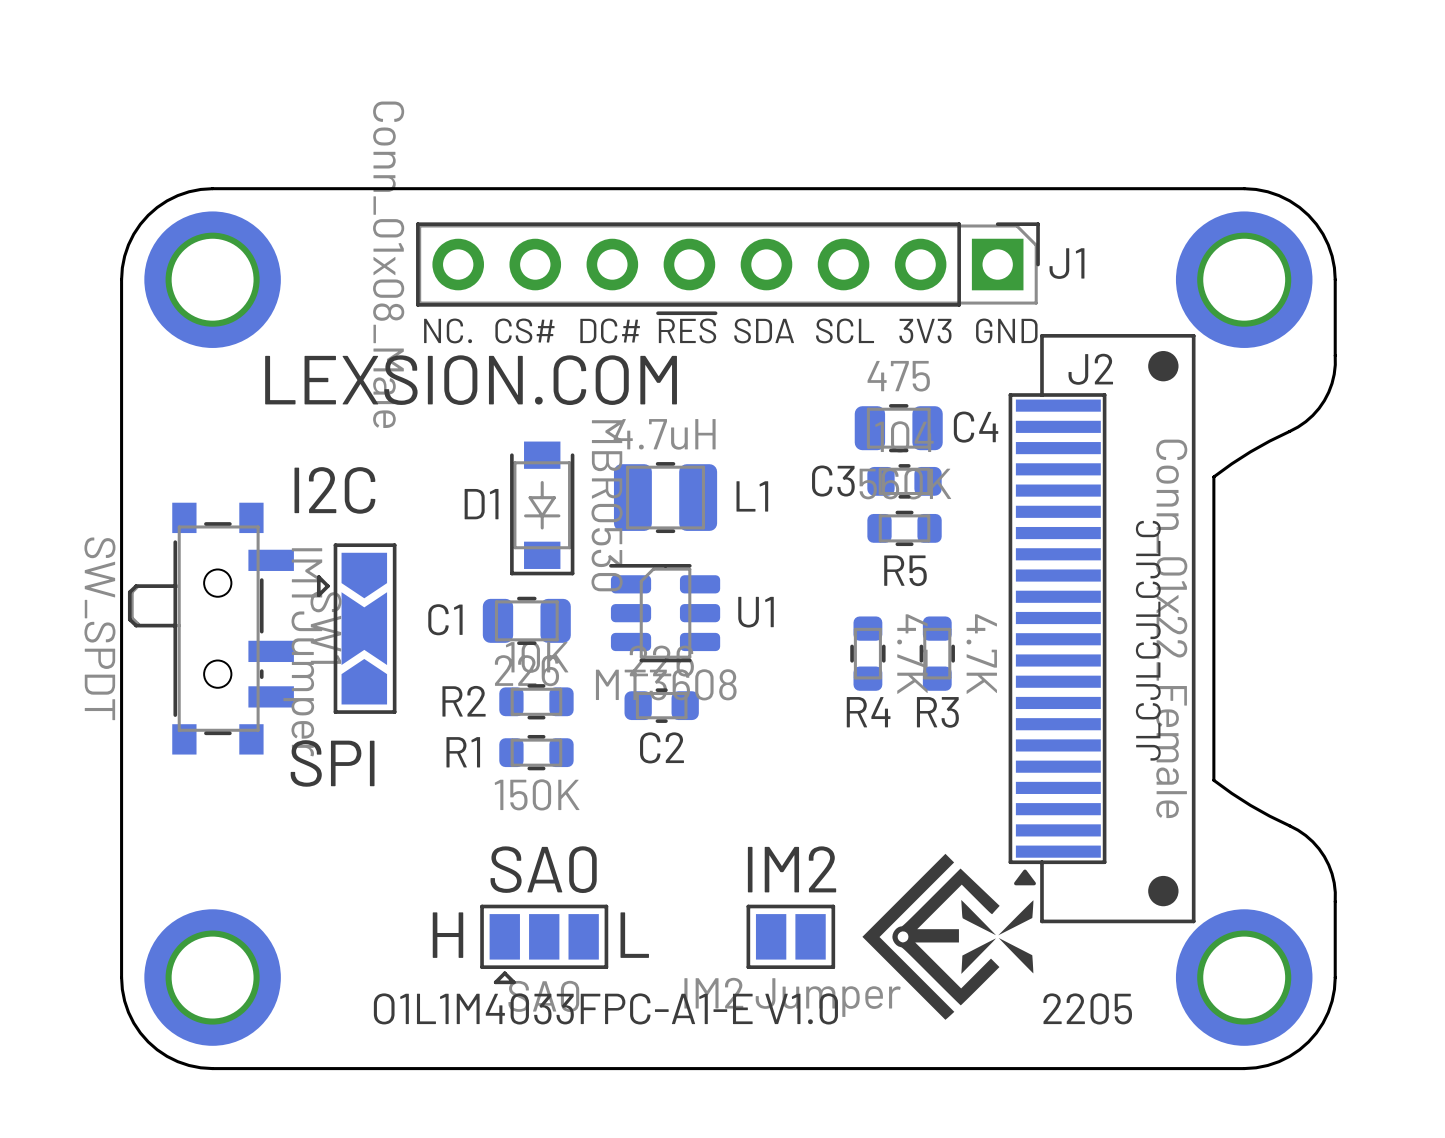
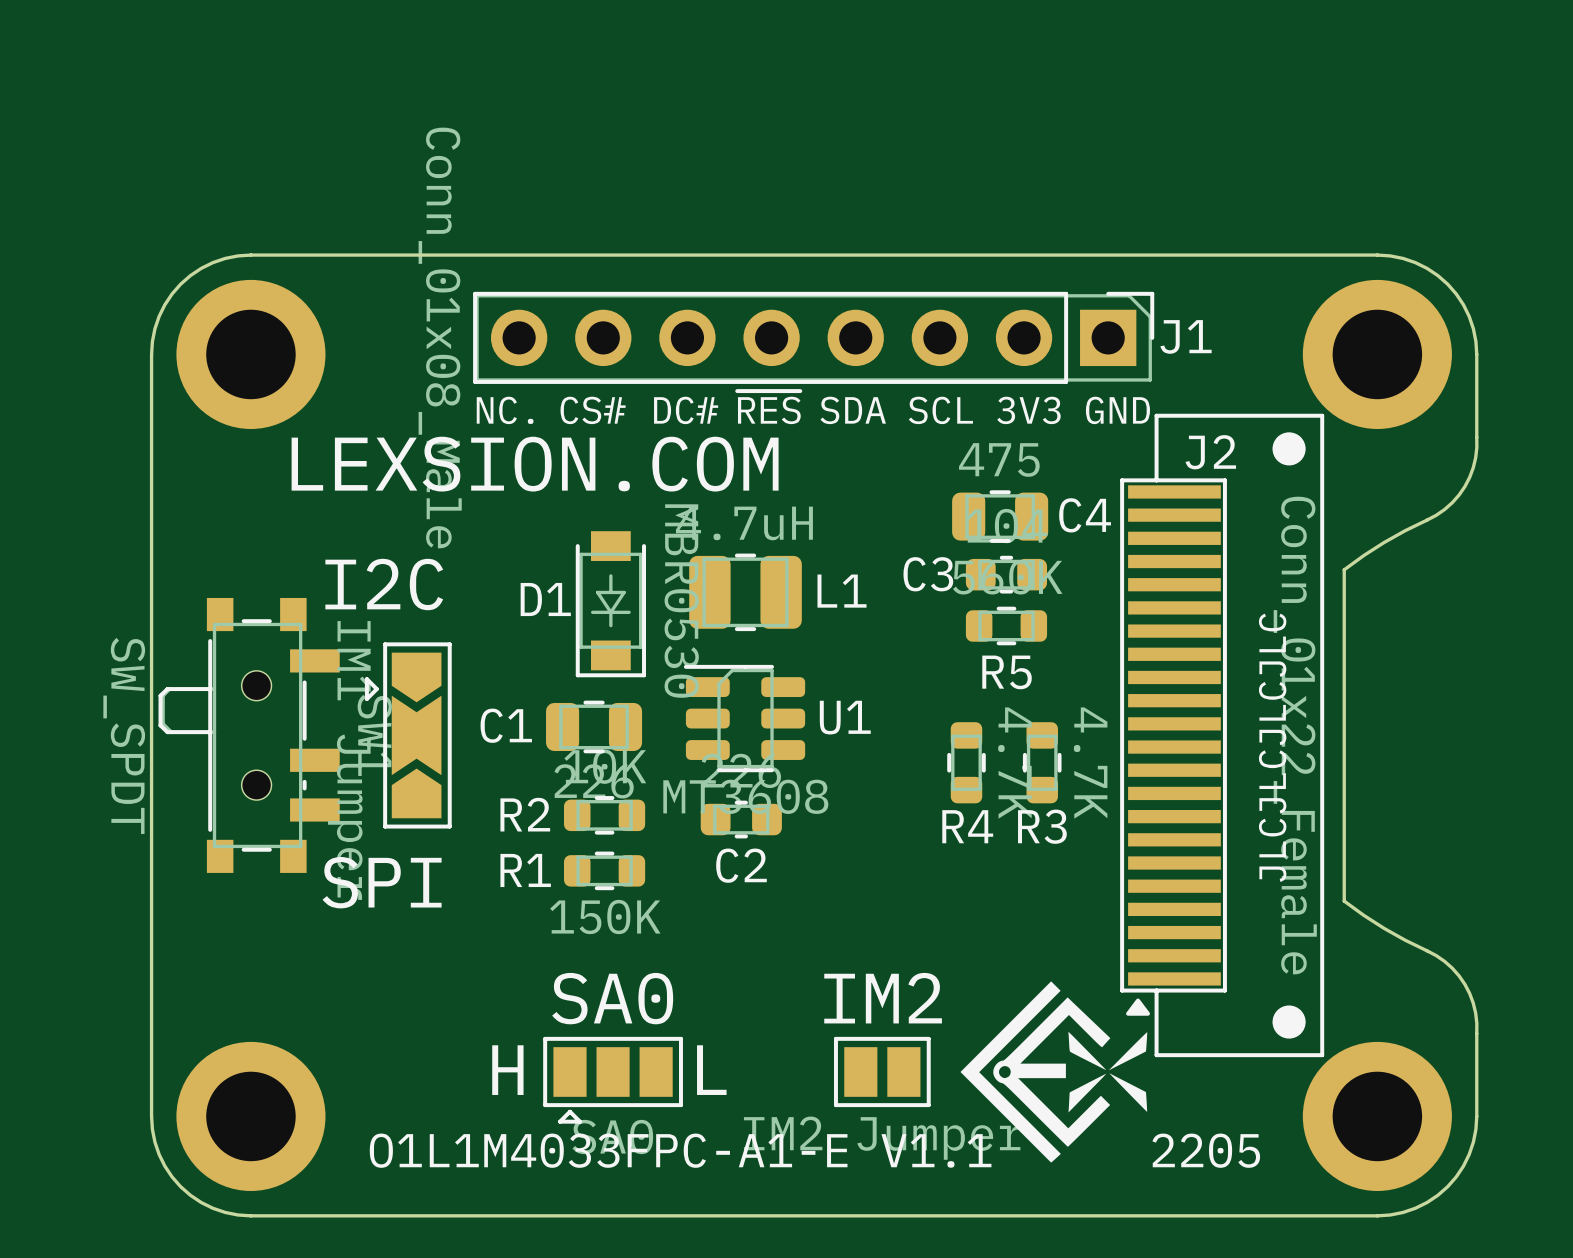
text: O1L1M4033FPC-A1-E V1.0 (605, 1008) -> O1L1M4033FPC-A1-E V1.1 (680, 1150)

